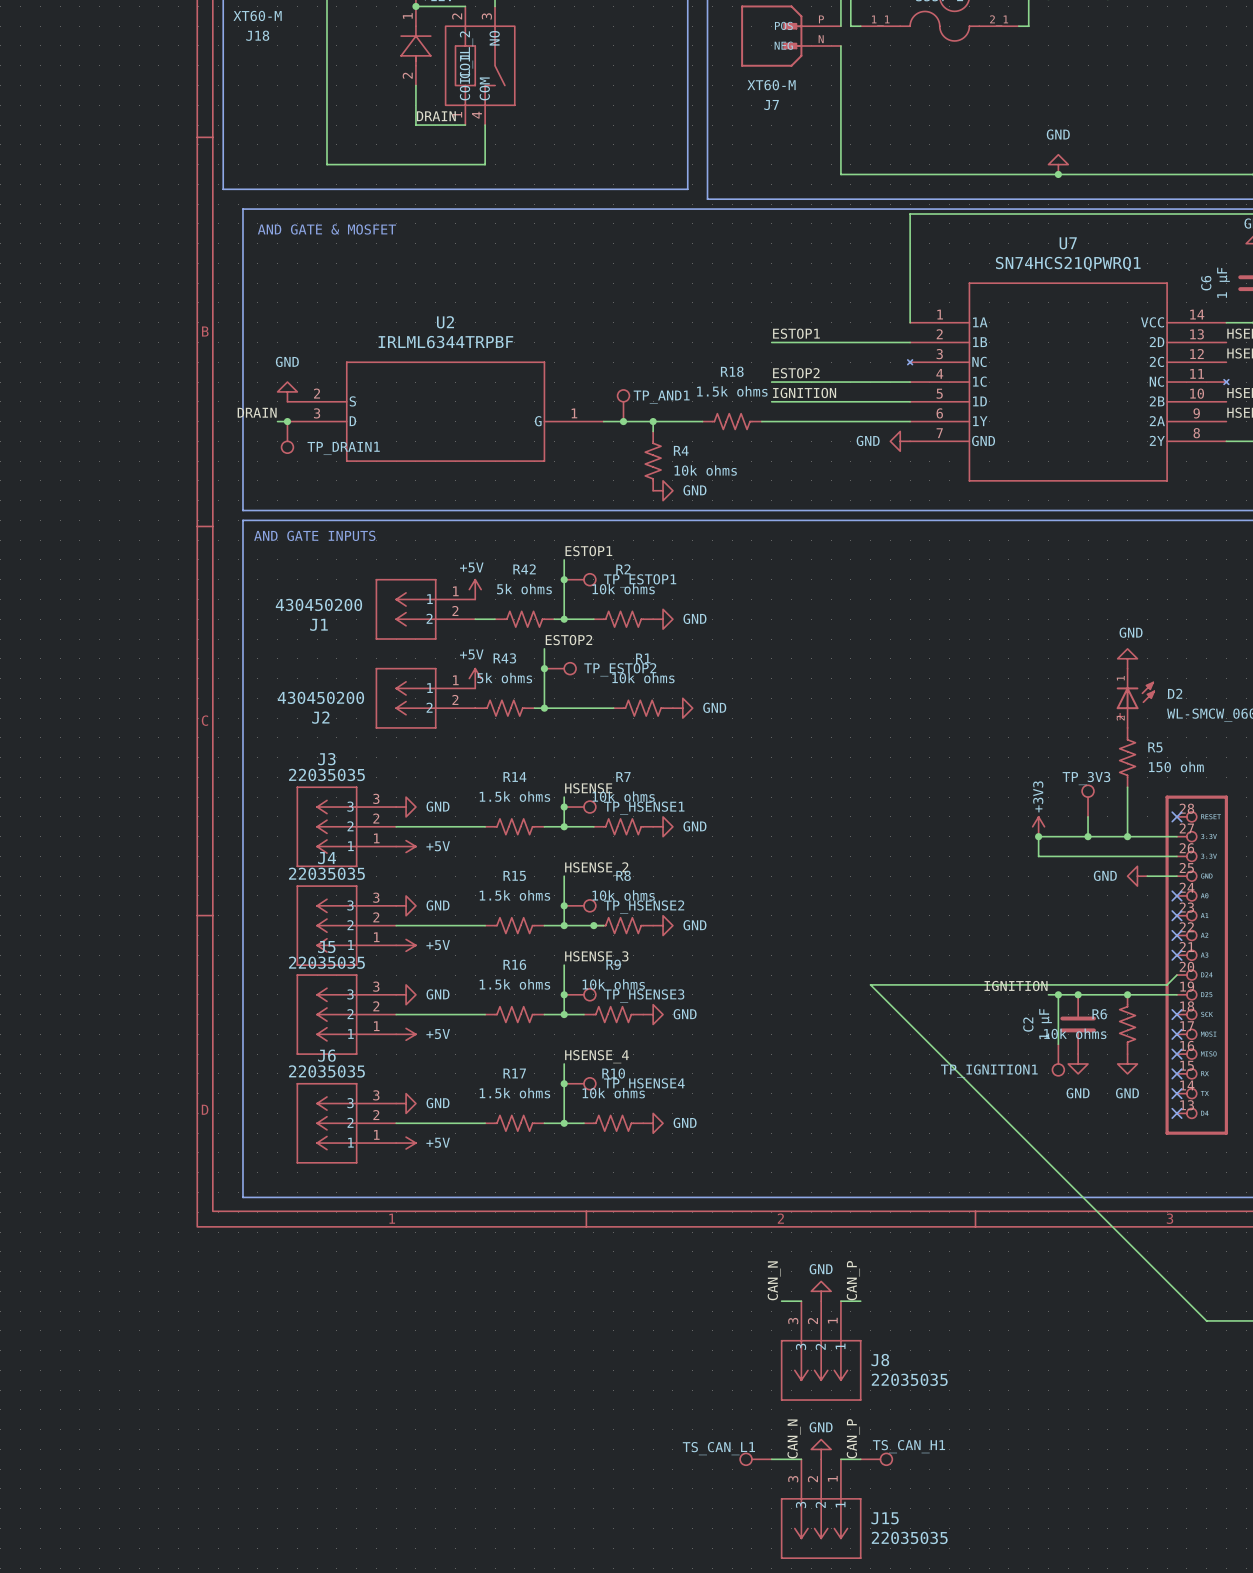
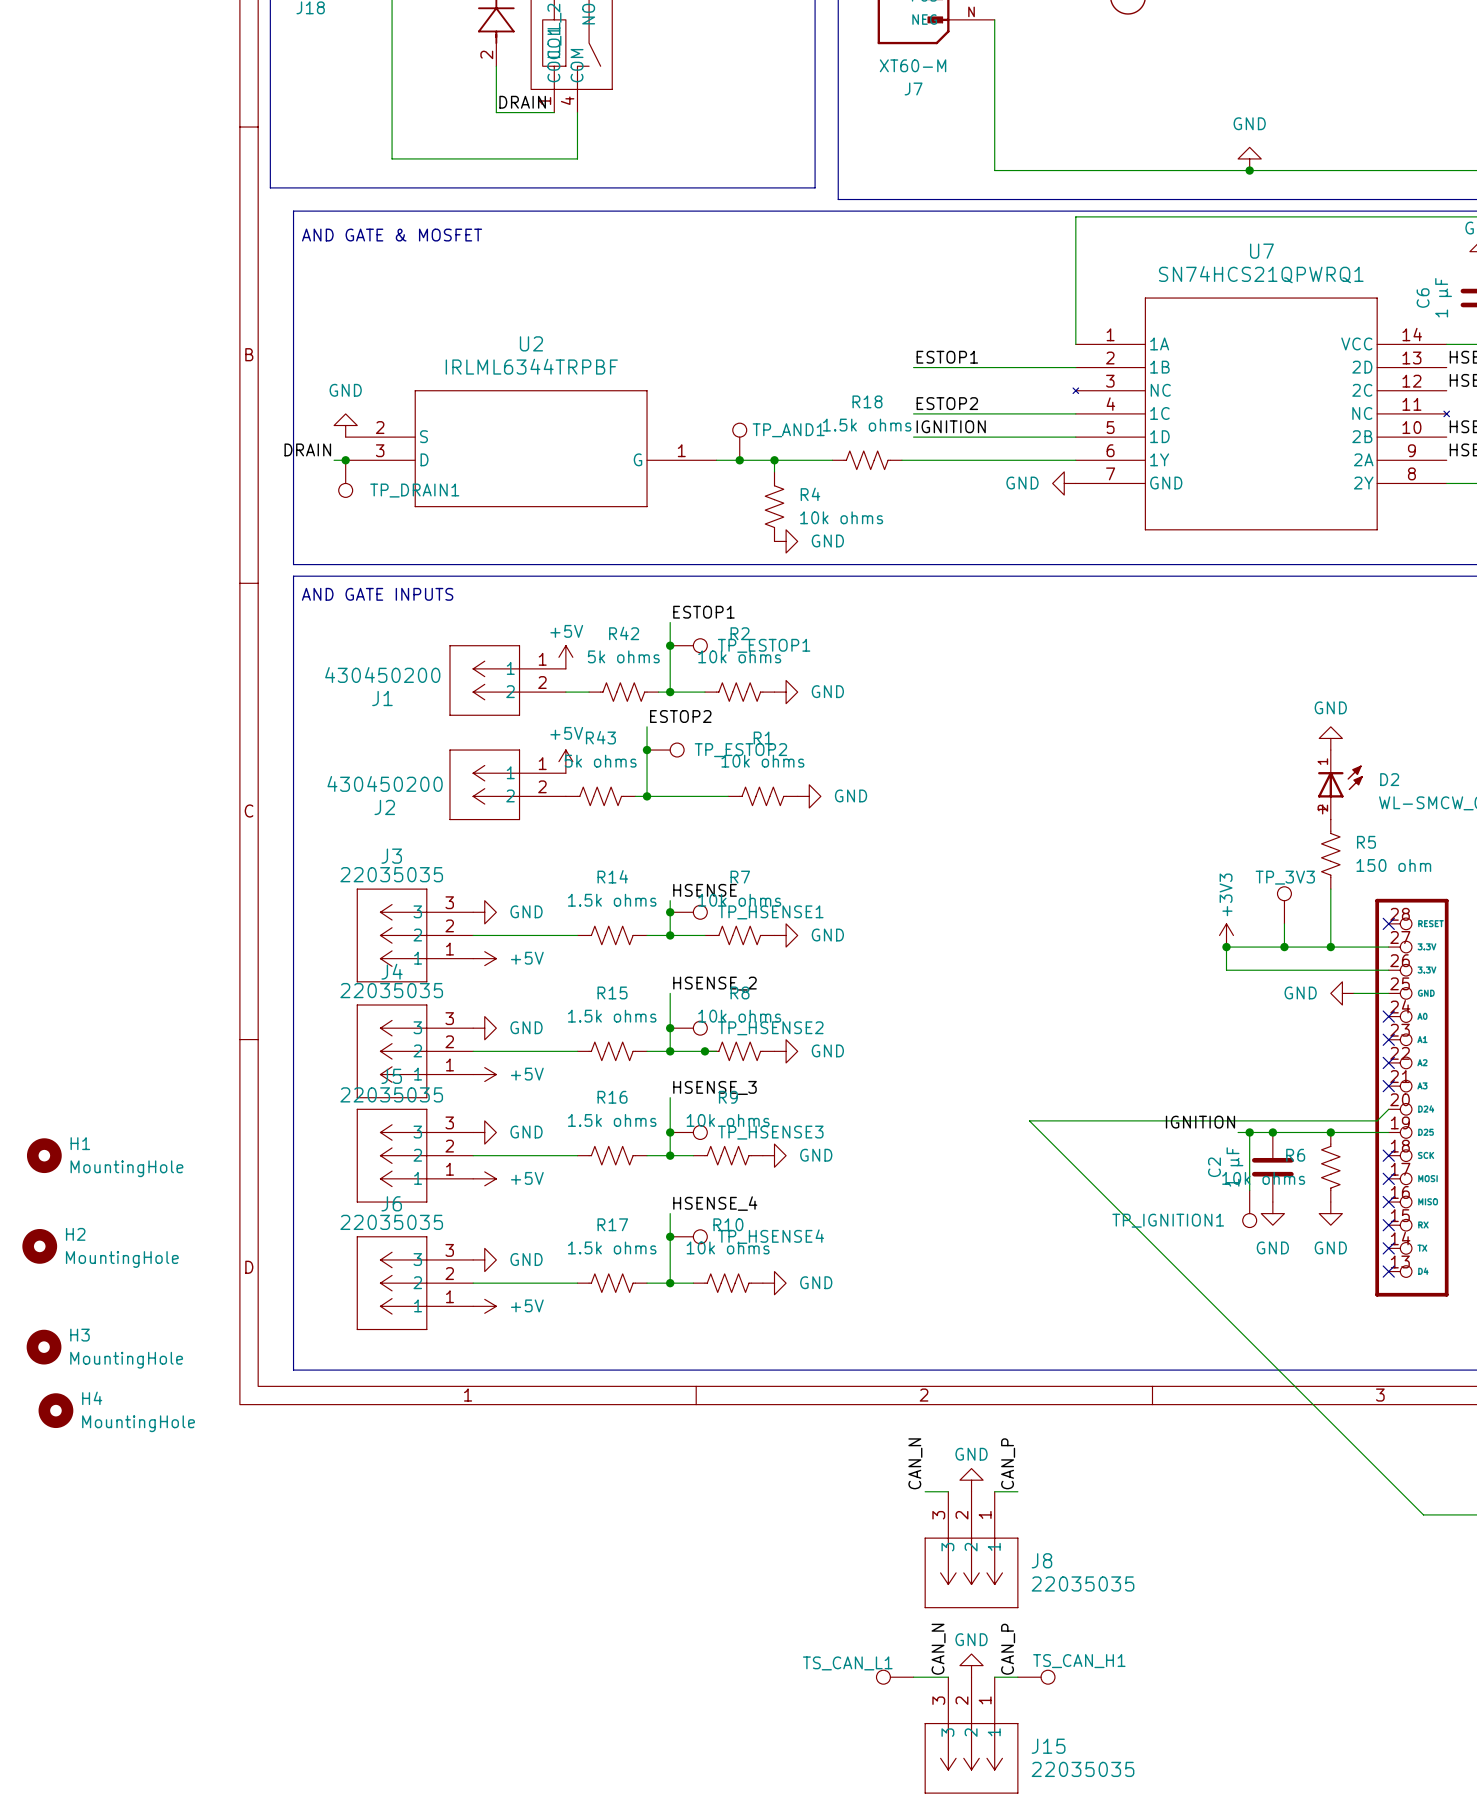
H1: none -> MountingHole (44, 1155)
H2: none -> MountingHole (39, 1246)
H3: none -> MountingHole (44, 1347)
H4: none -> MountingHole (55, 1410)

